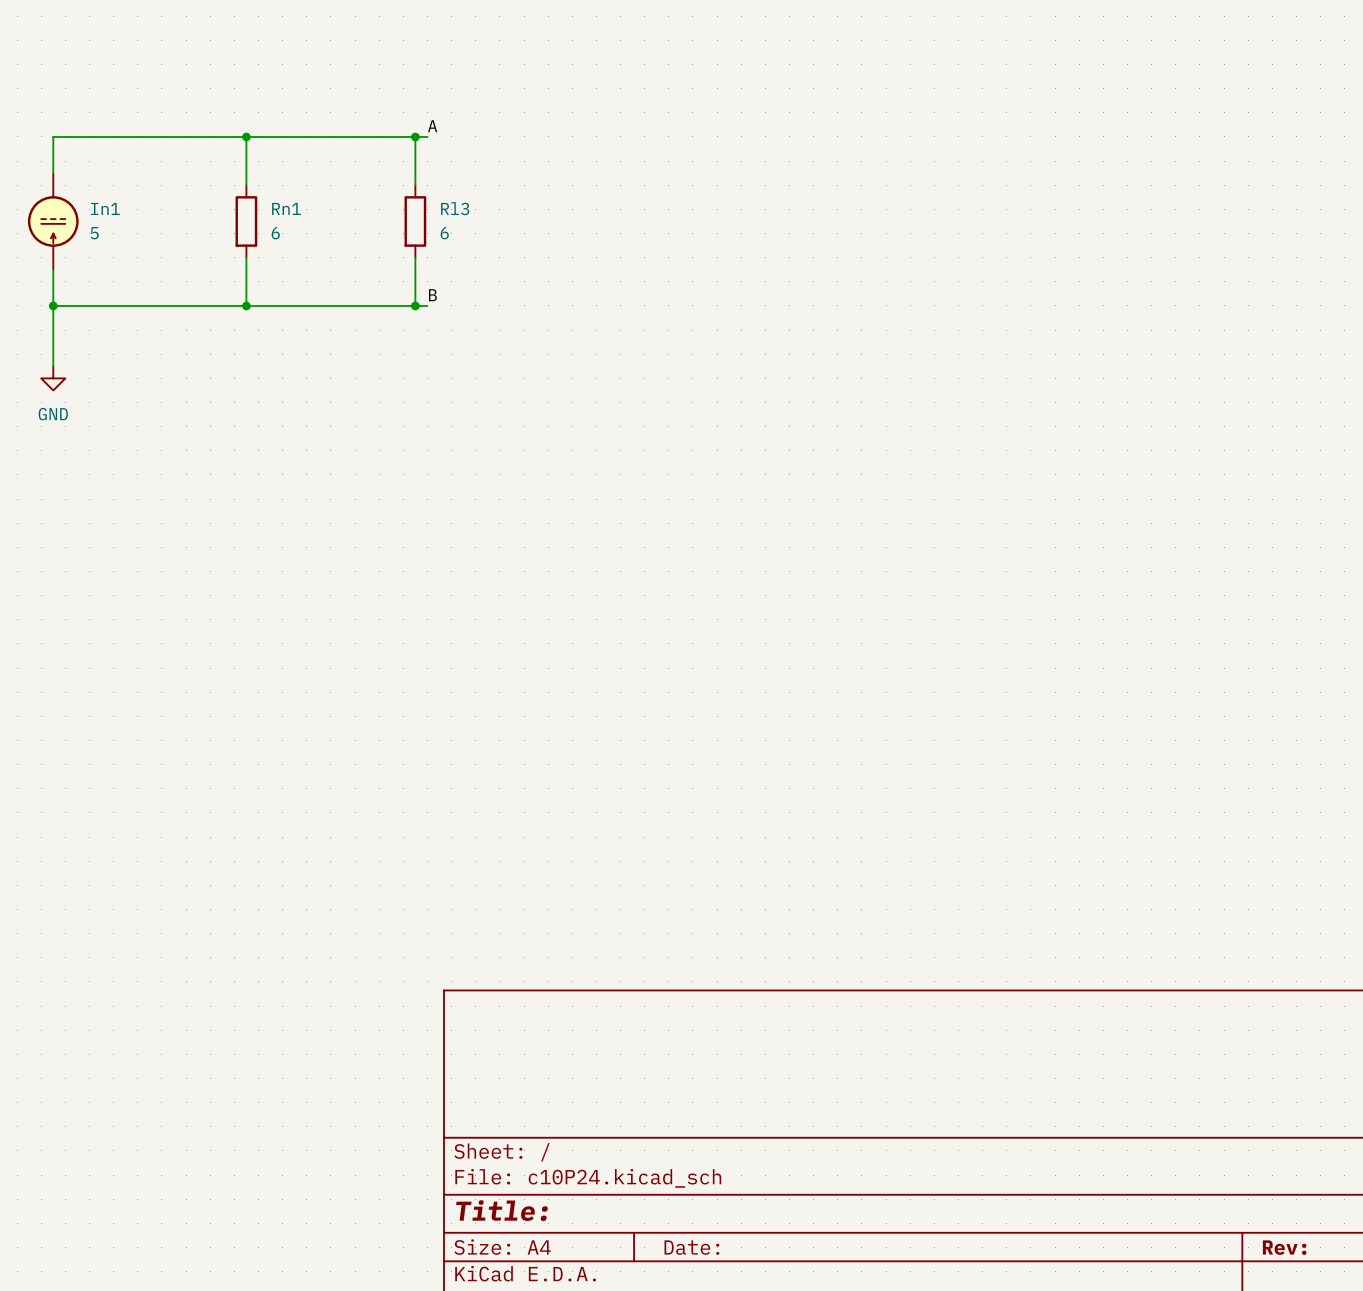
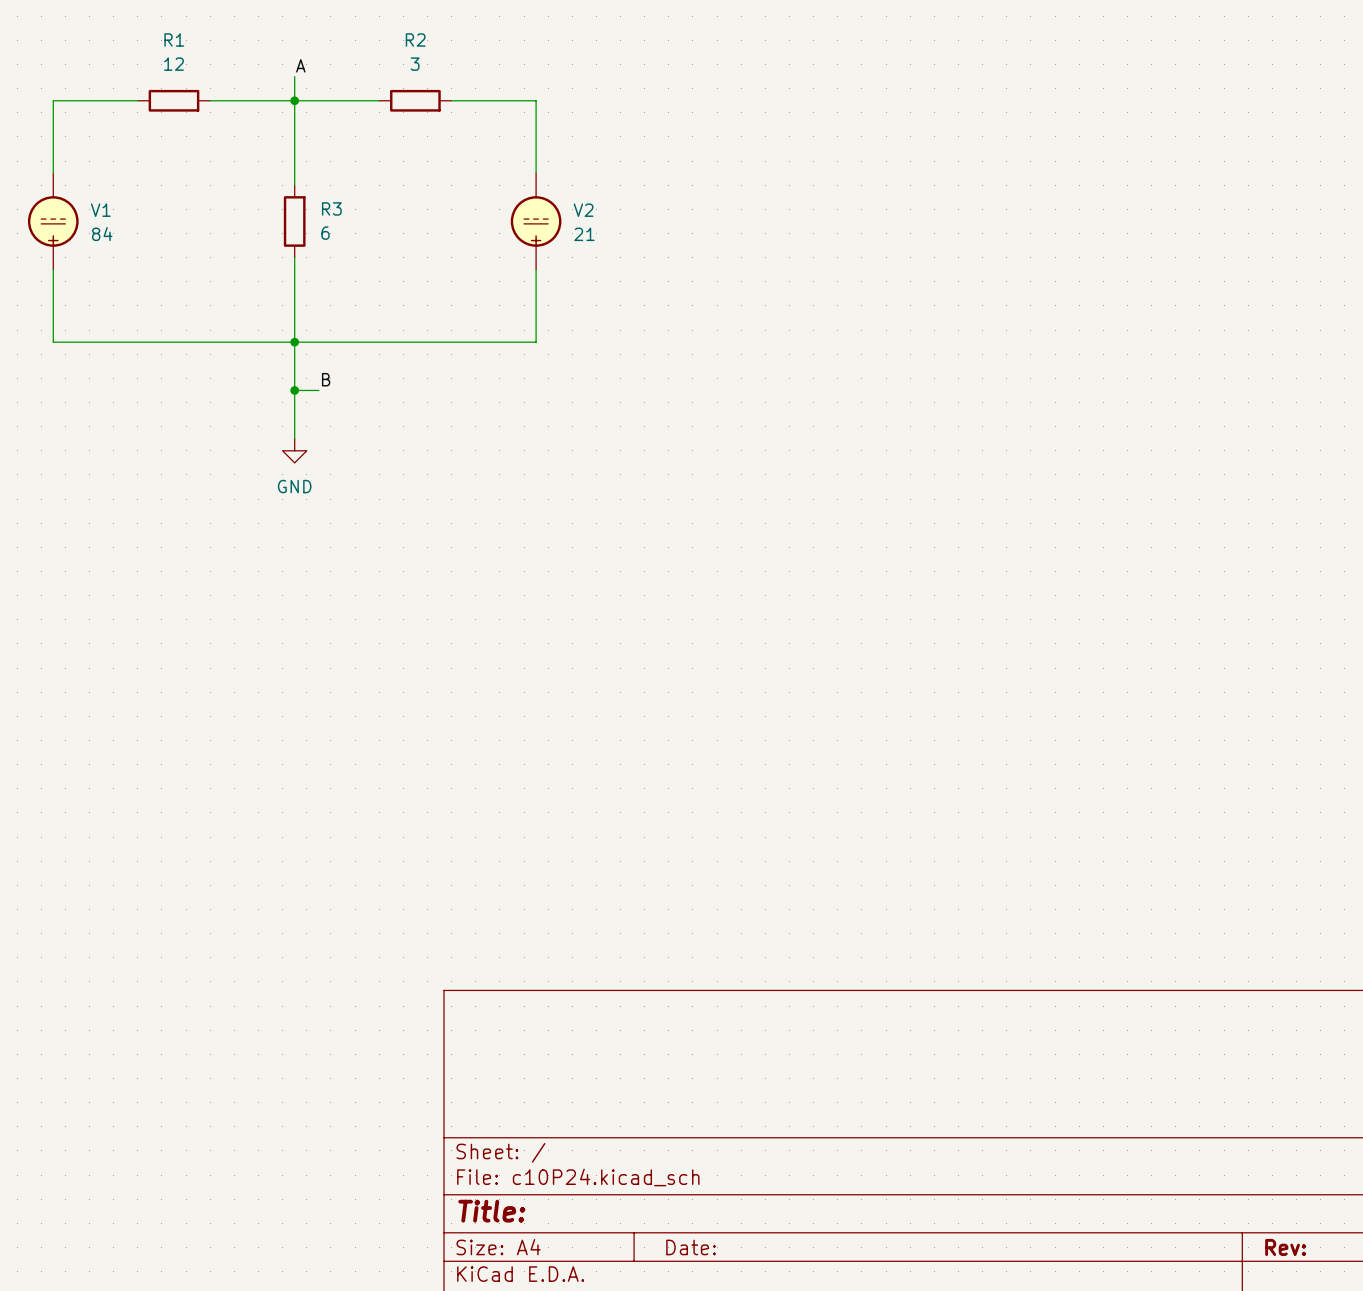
wire: none -> (294, 76) (294, 185)
R1: none -> 12 (173, 100)
wire: none -> (210, 100) (379, 100)
junction: none -> (294, 100)
R2: none -> 3 (415, 100)
wire: none -> (451, 100) (536, 100) (536, 173)
label position: A (432, 126) -> A (300, 65)
wire: (53, 136) (427, 136) -> (53, 136) (53, 100) (137, 100)
wire: (246, 136) (246, 185) -> none
junction: (246, 136) -> none
wire: (415, 136) (415, 185) -> none
junction: (415, 136) -> none
In1: 5 (53, 221) -> none
V1: none -> 84 (53, 221)
Rn1: 6 (246, 221) -> none
R3: none -> 6 (294, 221)
Rl3: 6 (415, 221) -> none
V2: none -> 21 (536, 221)
wire: (246, 257) (246, 305) -> none
wire: none -> (294, 257) (294, 438)
wire: (415, 257) (415, 305) -> none
label position: B (432, 295) -> B (326, 379)
wire: (53, 305) (427, 305) -> none
junction: (53, 305) -> none
junction: (246, 305) -> none
junction: (415, 305) -> none
wire: (53, 342) (53, 366) -> (53, 342) (536, 342) (536, 269)
junction: none -> (294, 342)
power symbol: GND (53, 378) -> none
wire: none -> (294, 390) (318, 390)
junction: none -> (294, 390)
power symbol: none -> GND (294, 450)

